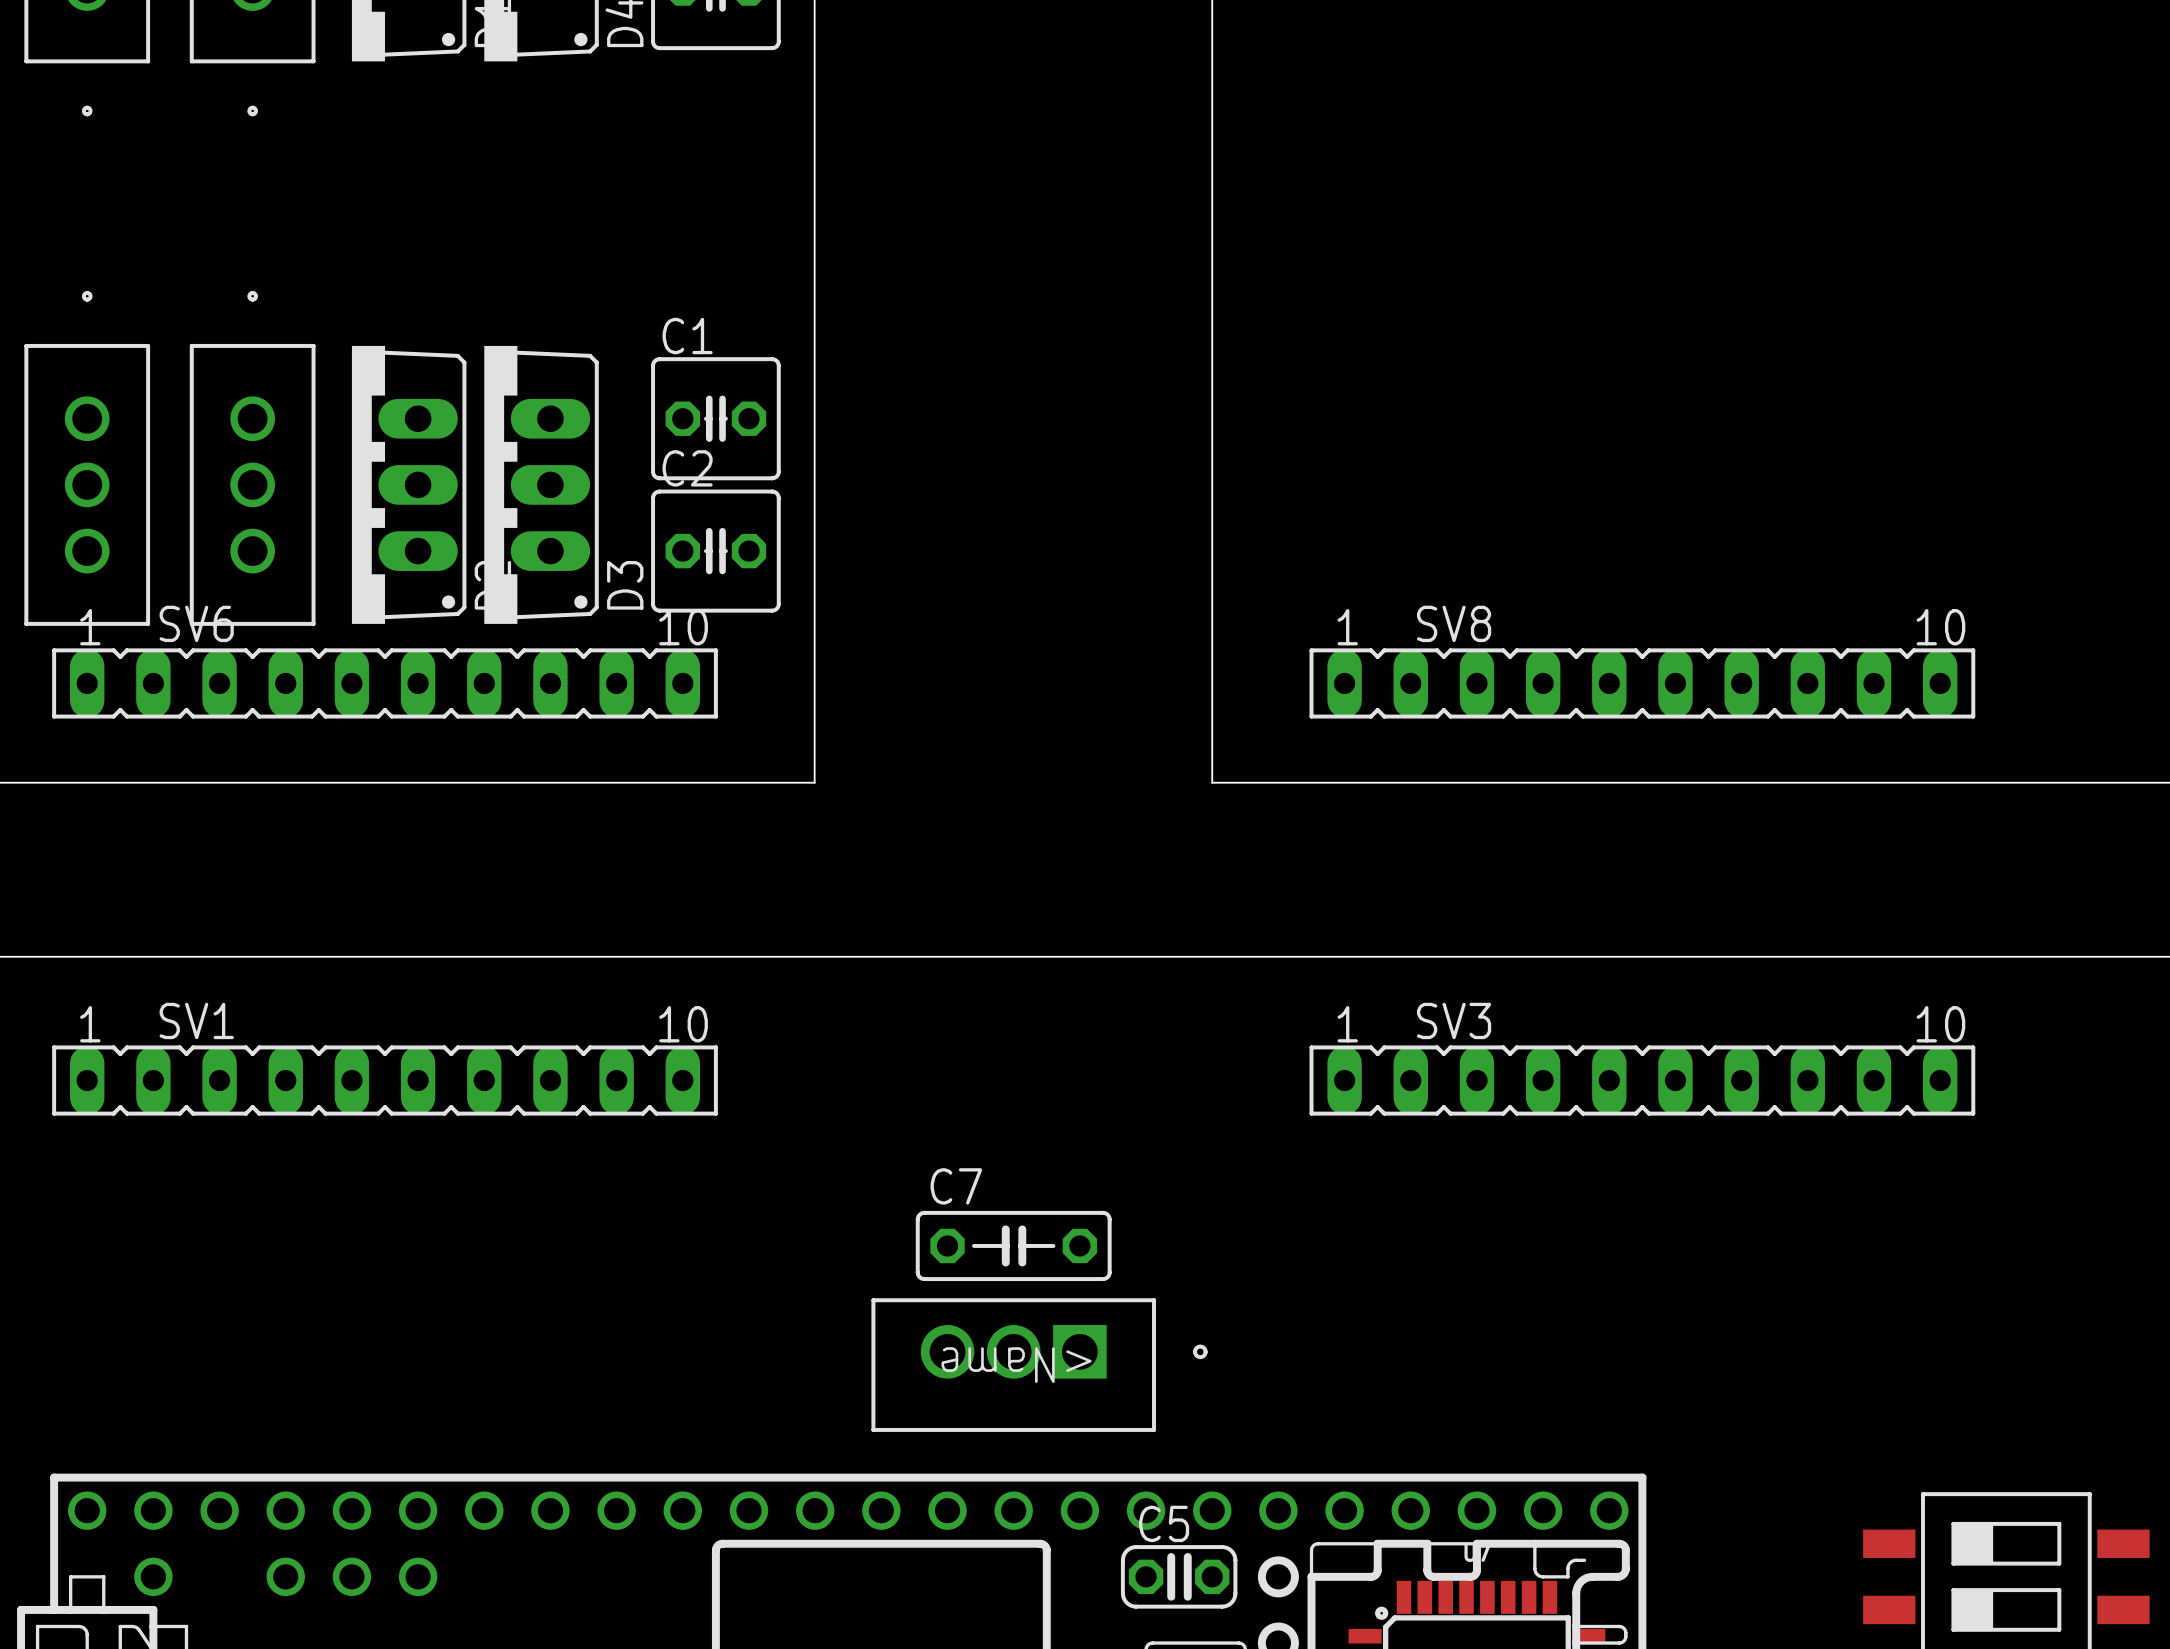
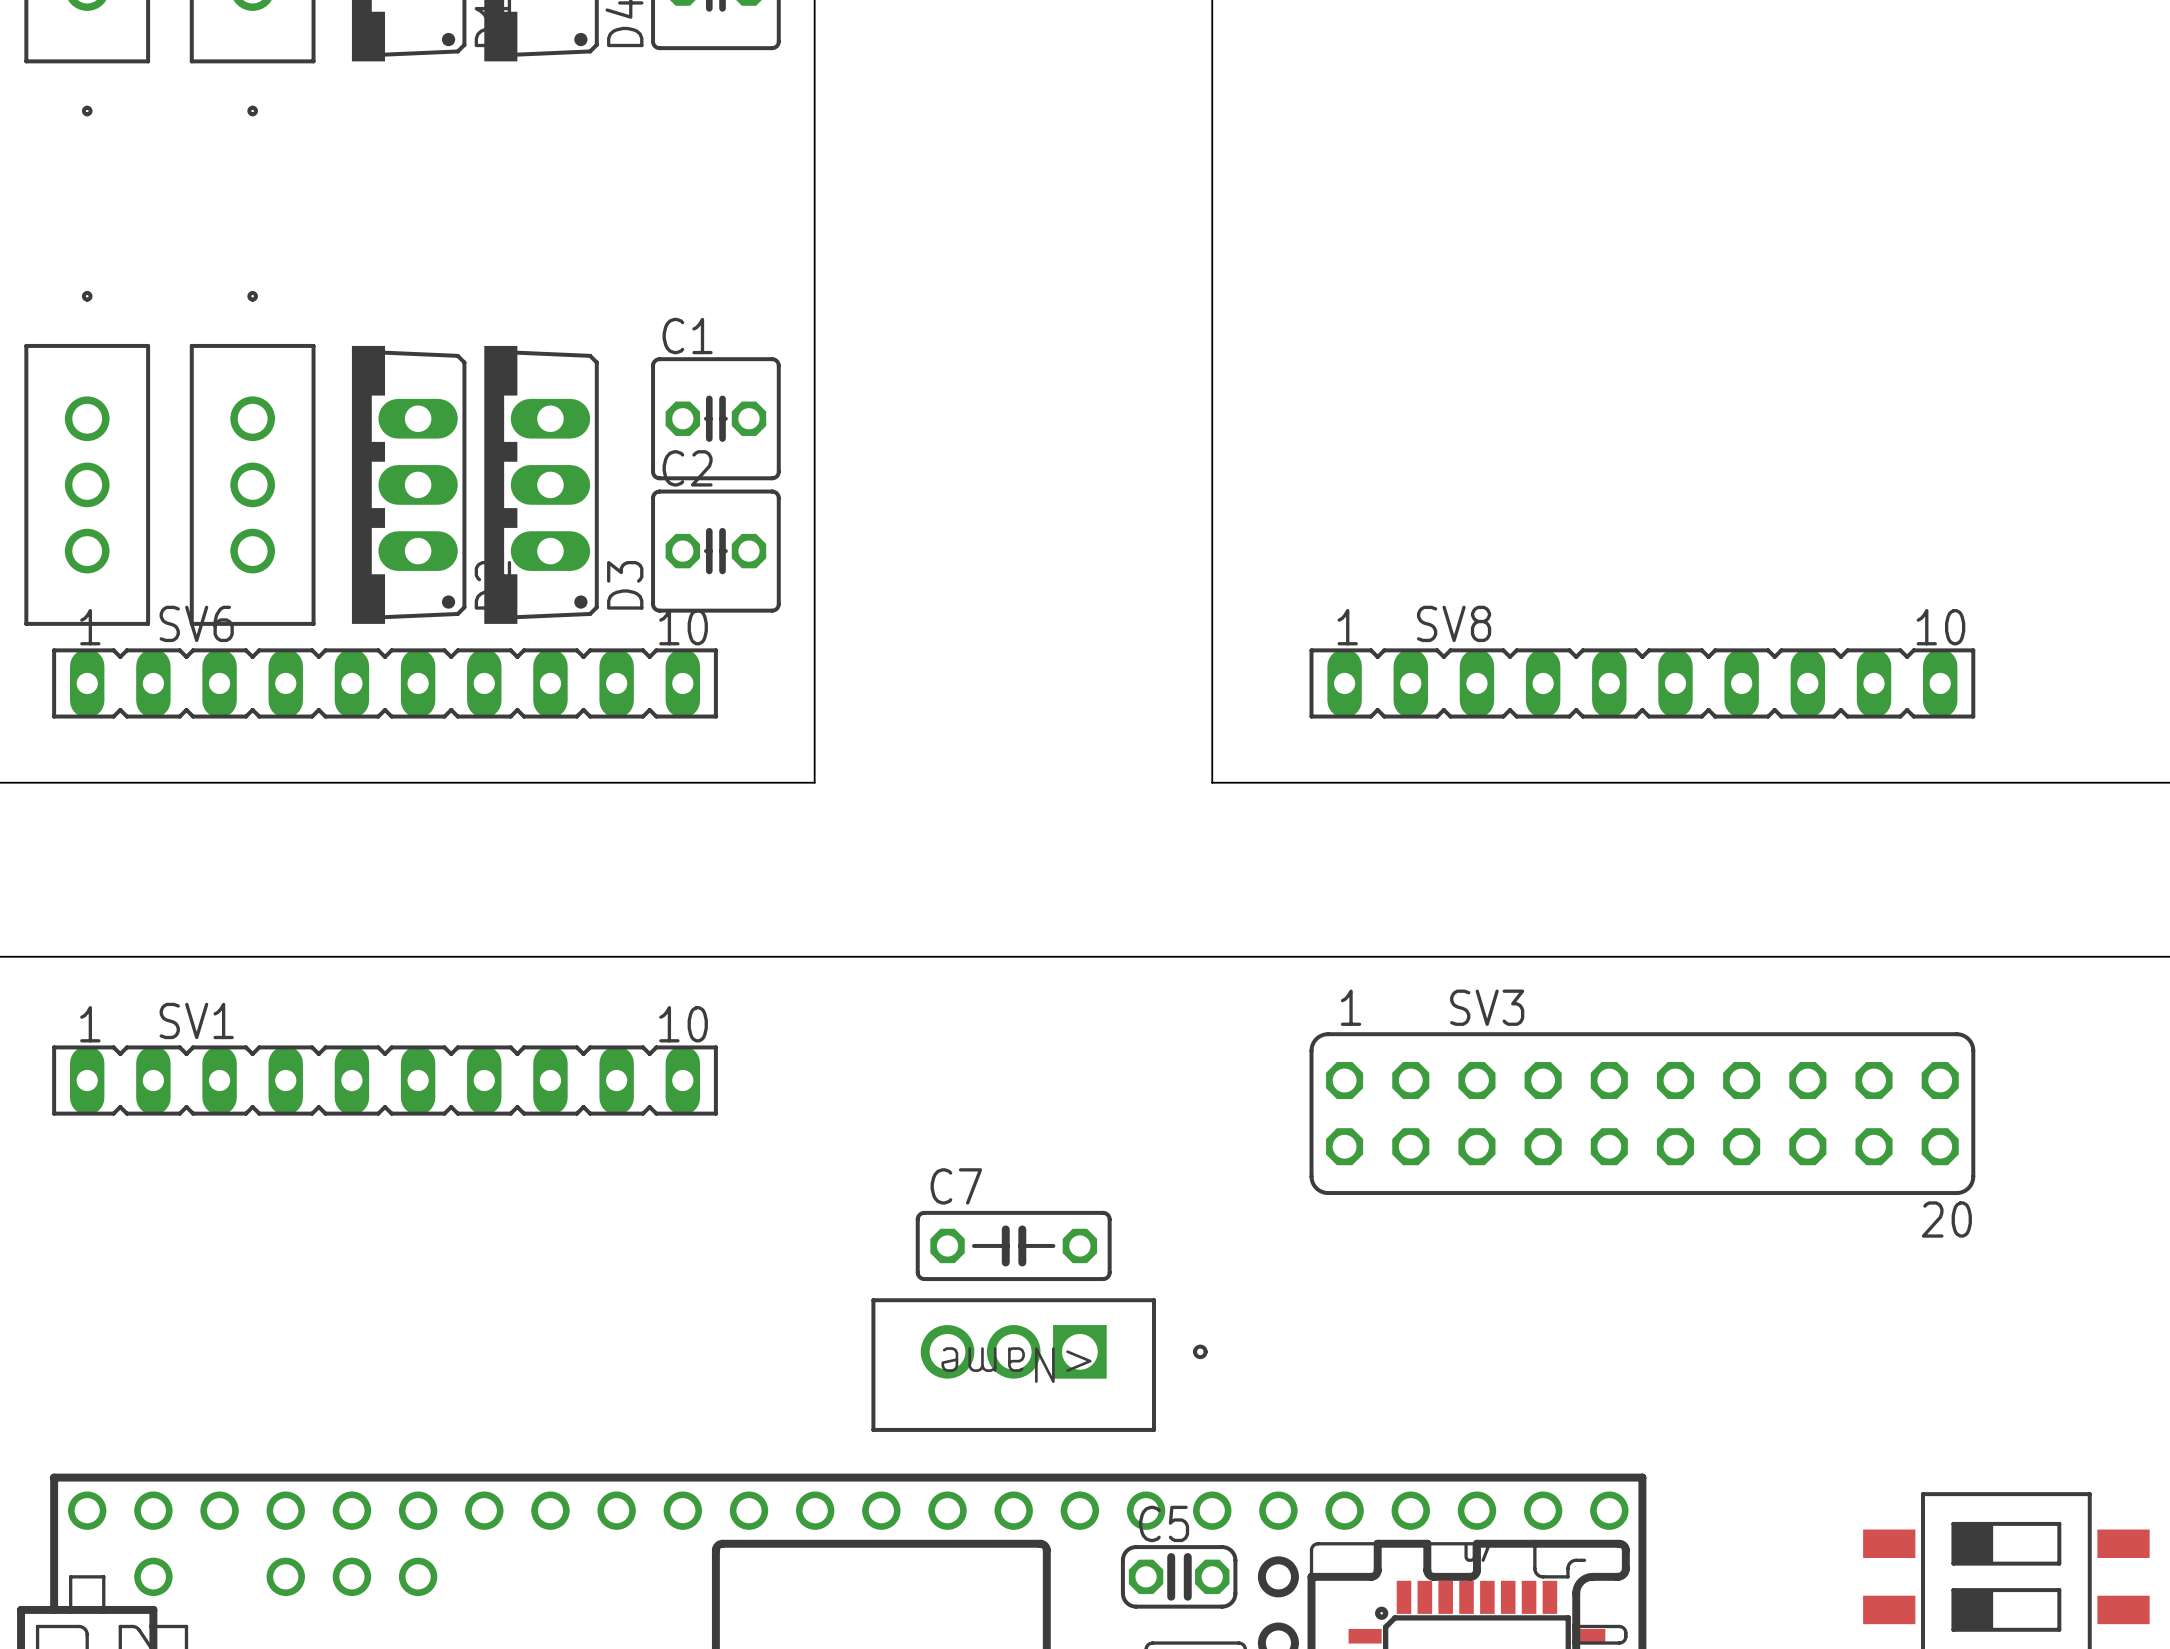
SV3 name position: SV3 (1454, 1020) -> SV3 (1487, 1007)
SV3 footprint: [1309, 1045, 1976, 1116] -> [1309, 1032, 1976, 1196]

